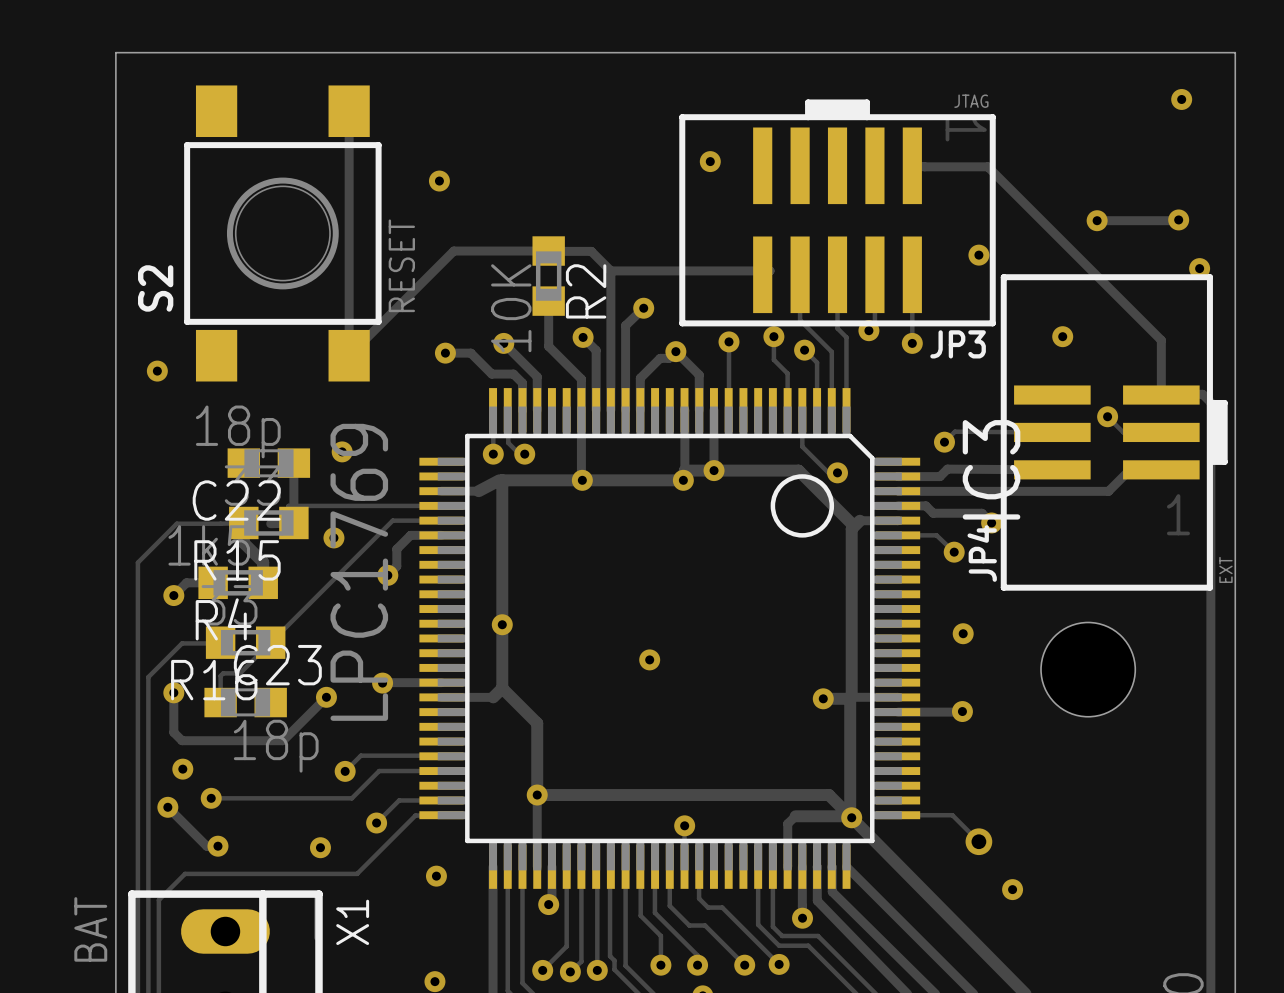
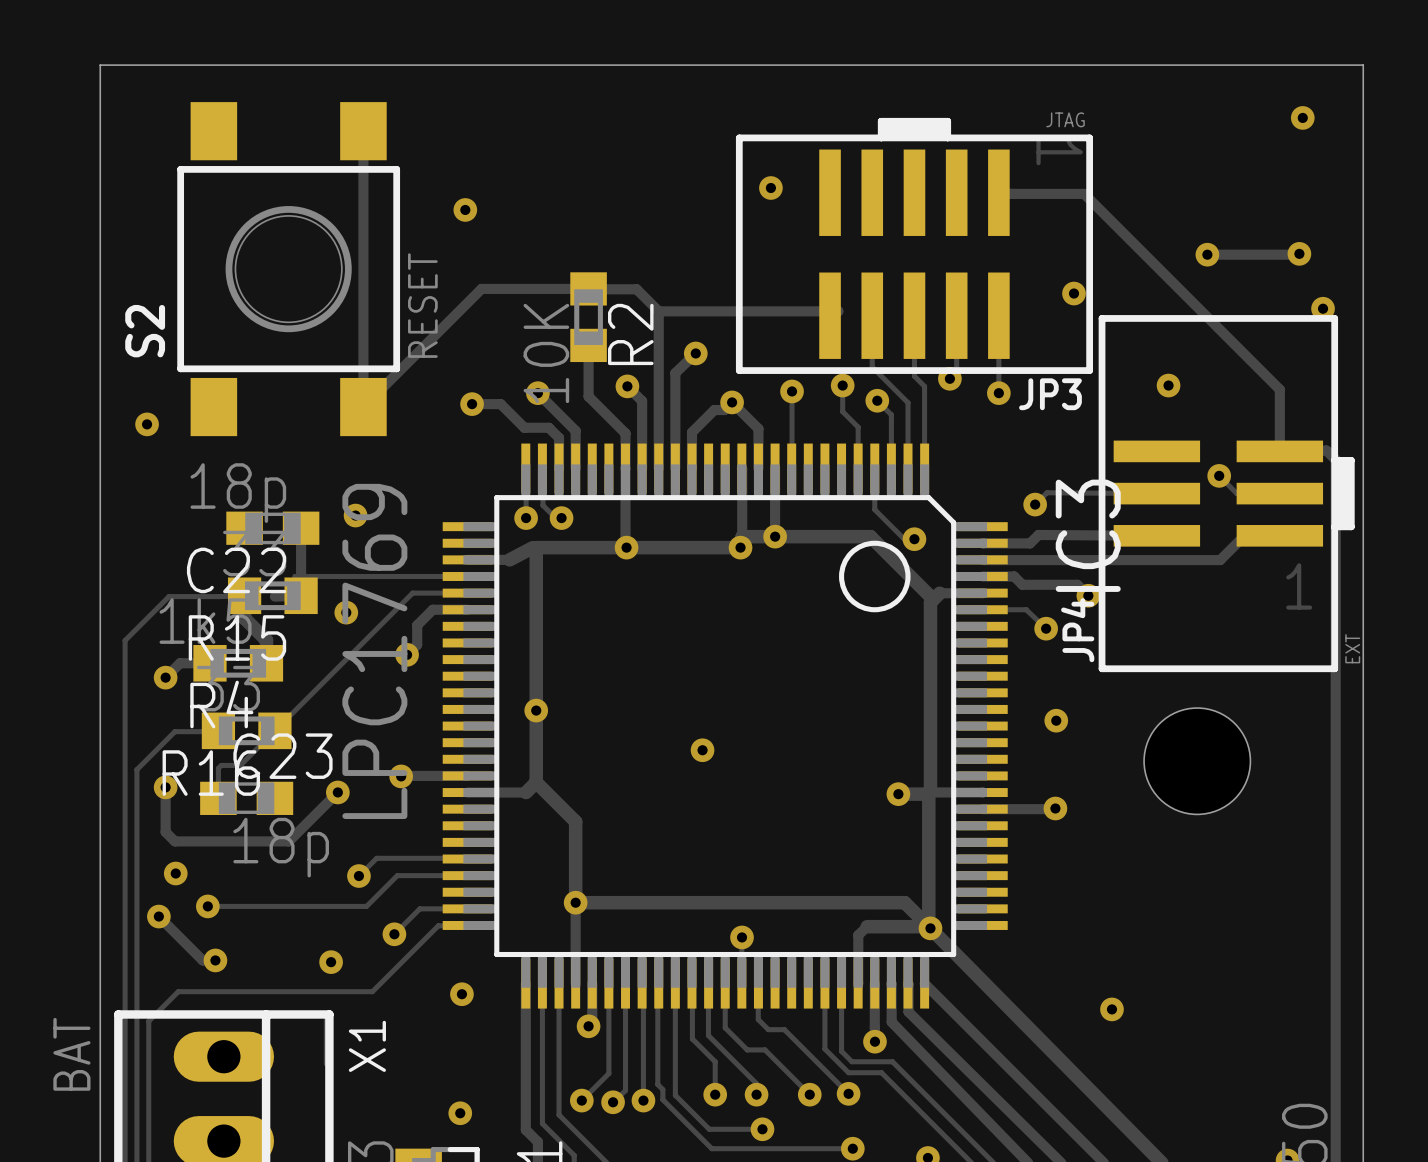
track: (898, 815) (952, 815) (978, 841) -> none
via: (978, 841) -> none

